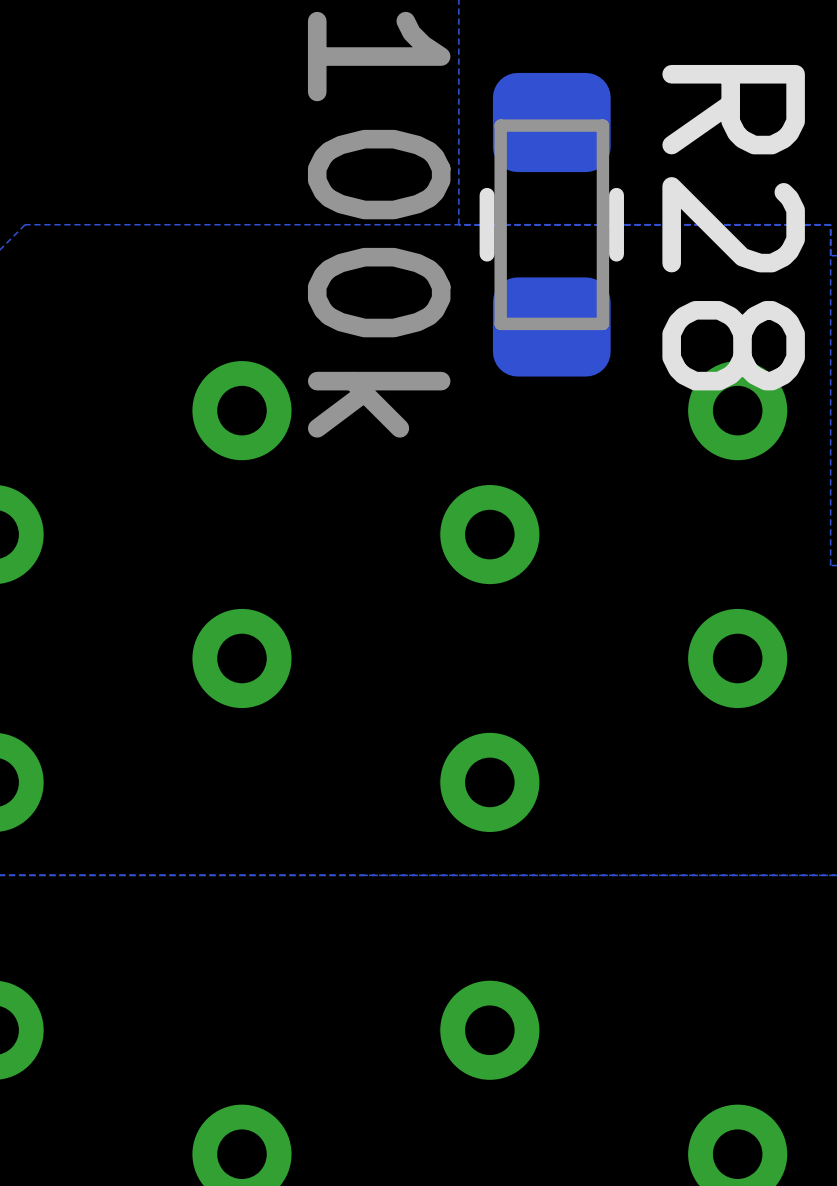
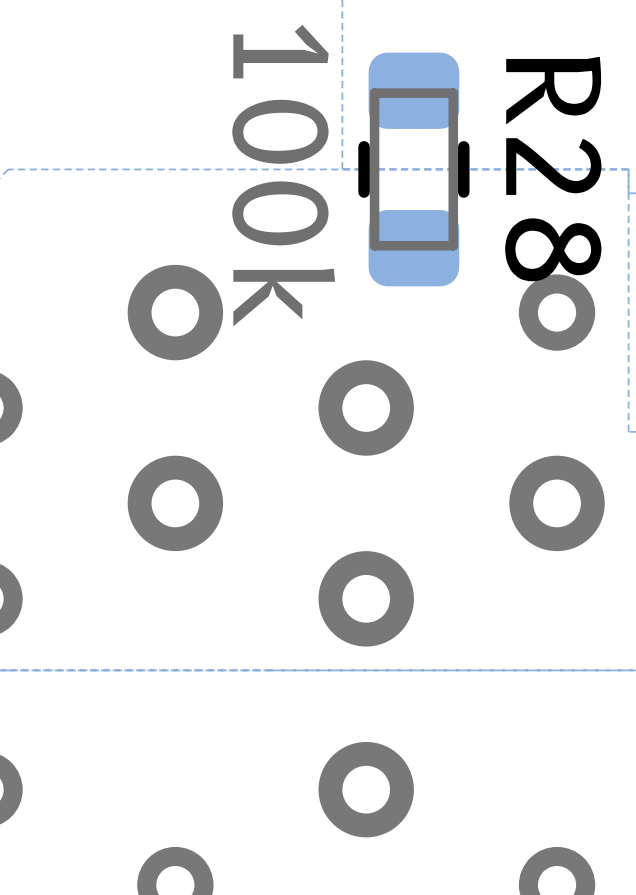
via size: [192, 361, 292, 461] -> [127, 264, 224, 361]
via size: [440, 484, 540, 585] -> [318, 360, 414, 456]
via size: [192, 608, 292, 709] -> [127, 455, 224, 552]
via size: [688, 608, 788, 709] -> [509, 455, 605, 552]
via size: [440, 732, 540, 832] -> [318, 551, 414, 647]
via size: [440, 980, 540, 1080] -> [318, 741, 414, 838]

